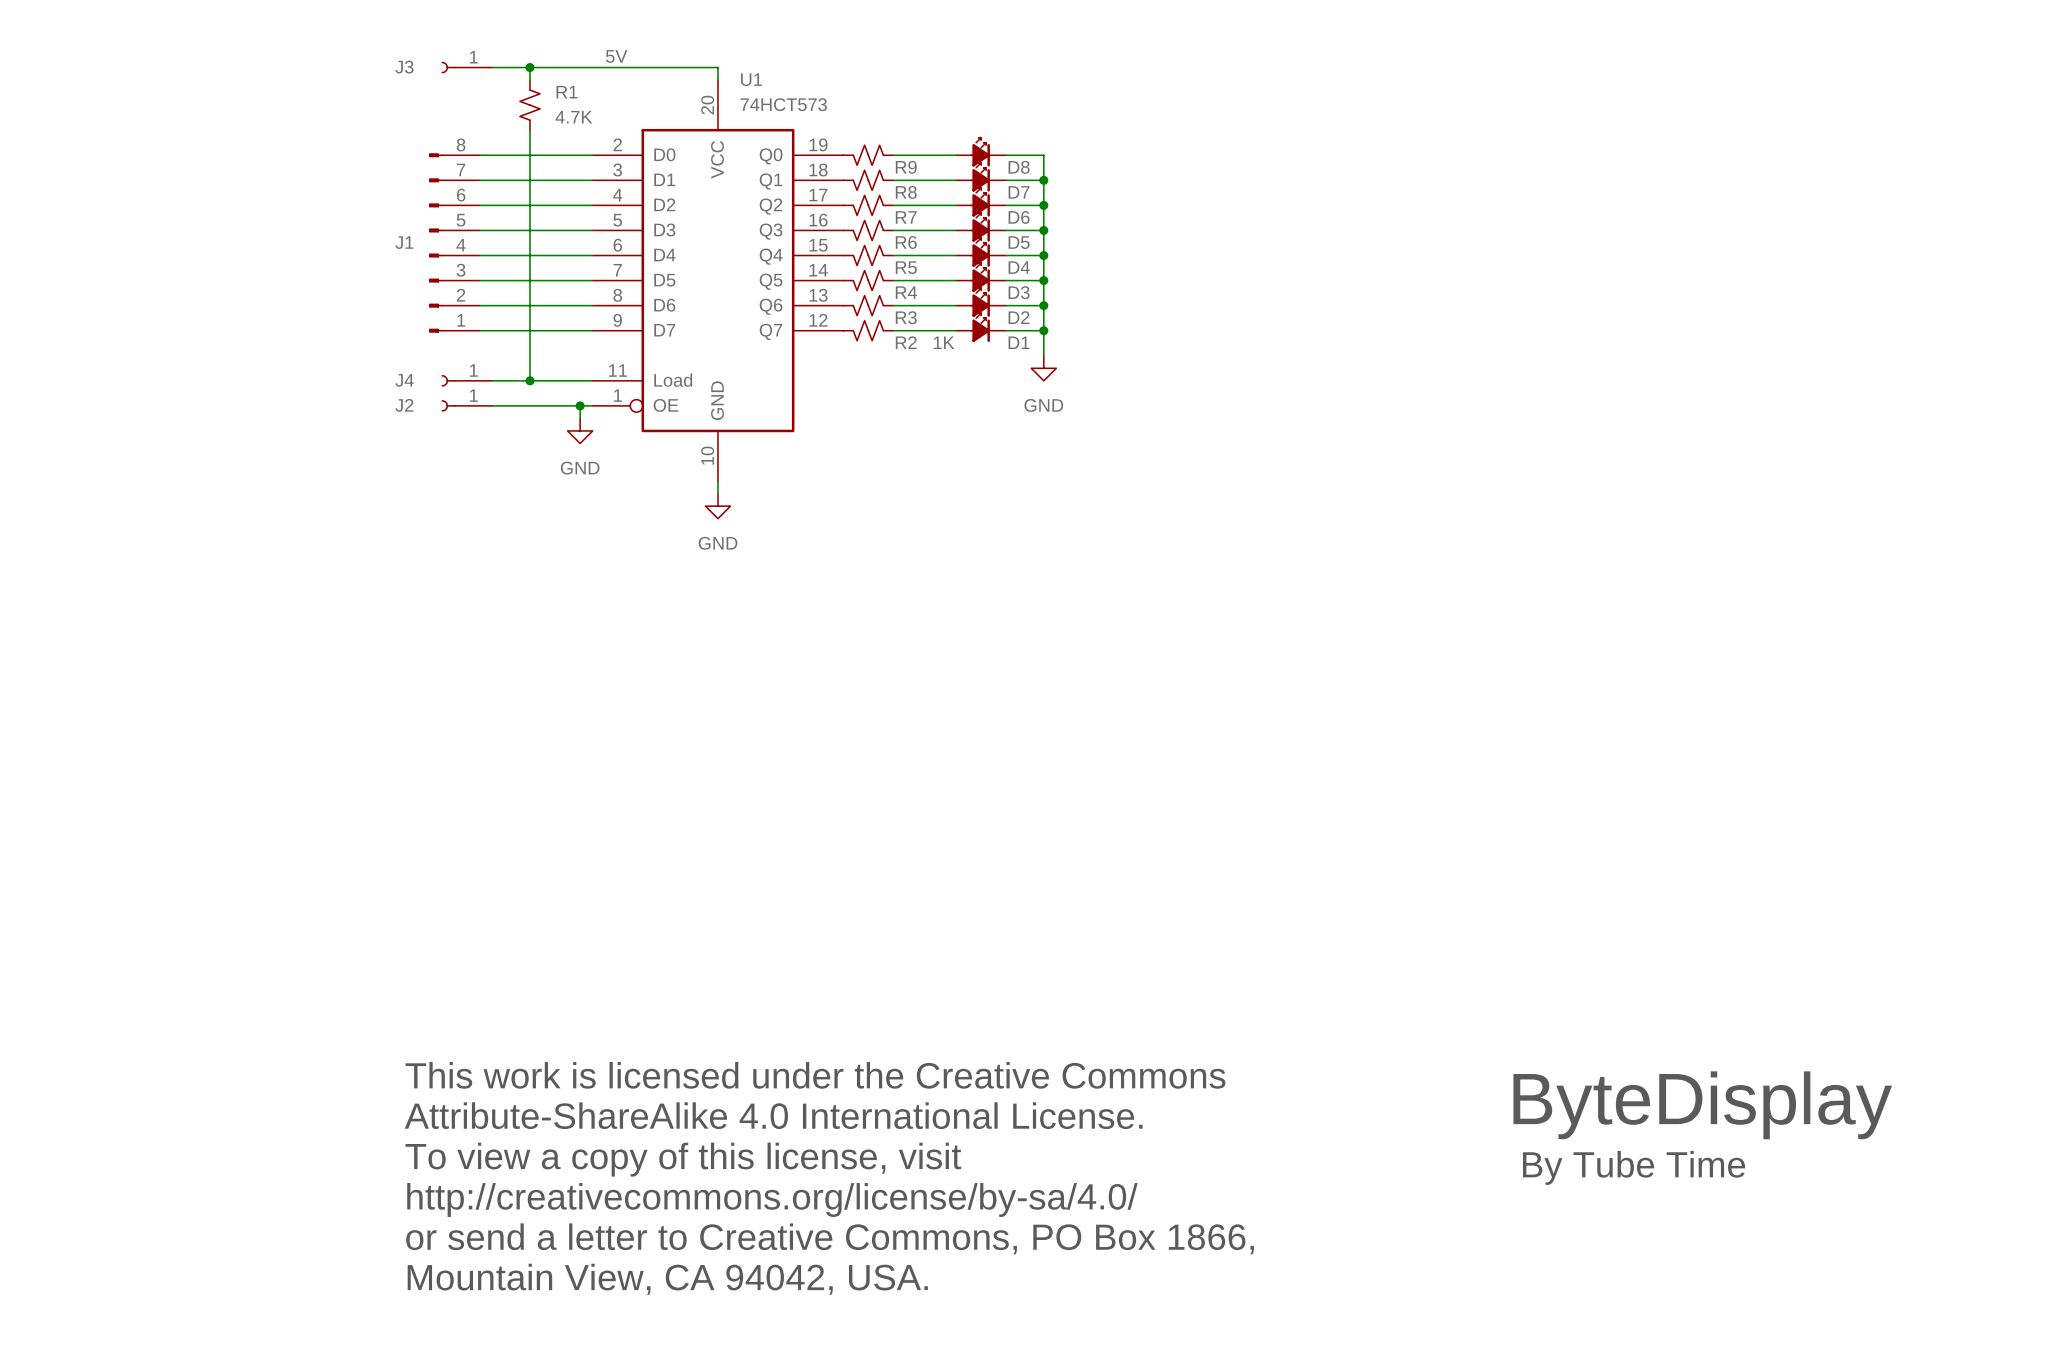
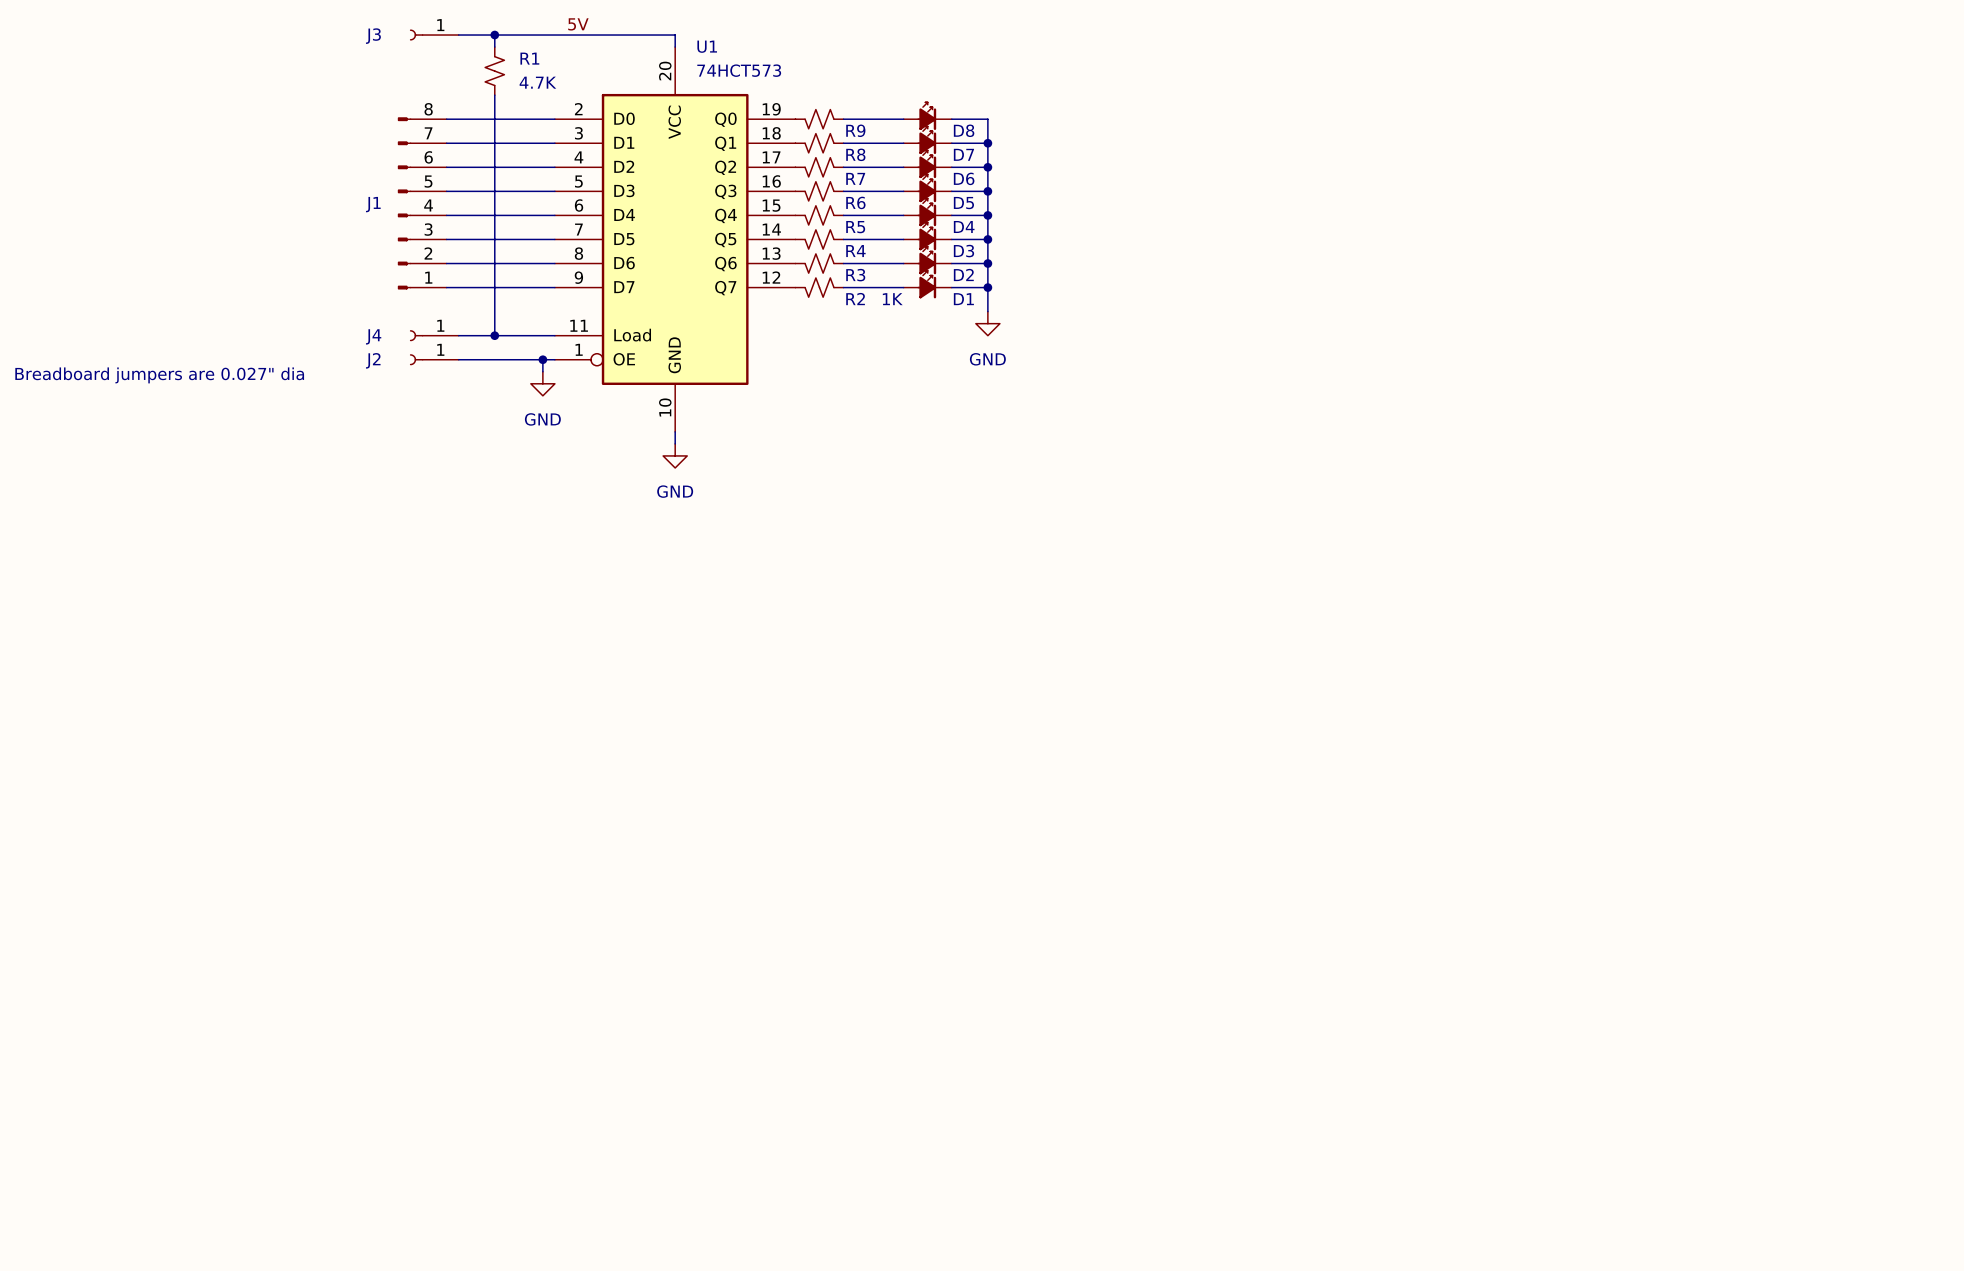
text: none -> Breadboard jumpers are 0.027" dia (159, 375)
text: This work is licensed under the Creative Commons (815, 1075) -> none
text: ByteDisplay (1702, 1105) -> none
text: Attribute-ShareAlike 4.0 International License. (773, 1115) -> none
text: To view a copy of this license, visit (683, 1159) -> none
text: By Tube Time (1634, 1167) -> none
text: http://creativecommons.org/license/by-sa/4.0/ (772, 1199) -> none
text: or send a letter to Creative Commons, PO Box 1866, (830, 1238) -> none
text: Mountain View, CA 94042, USA. (667, 1279) -> none

